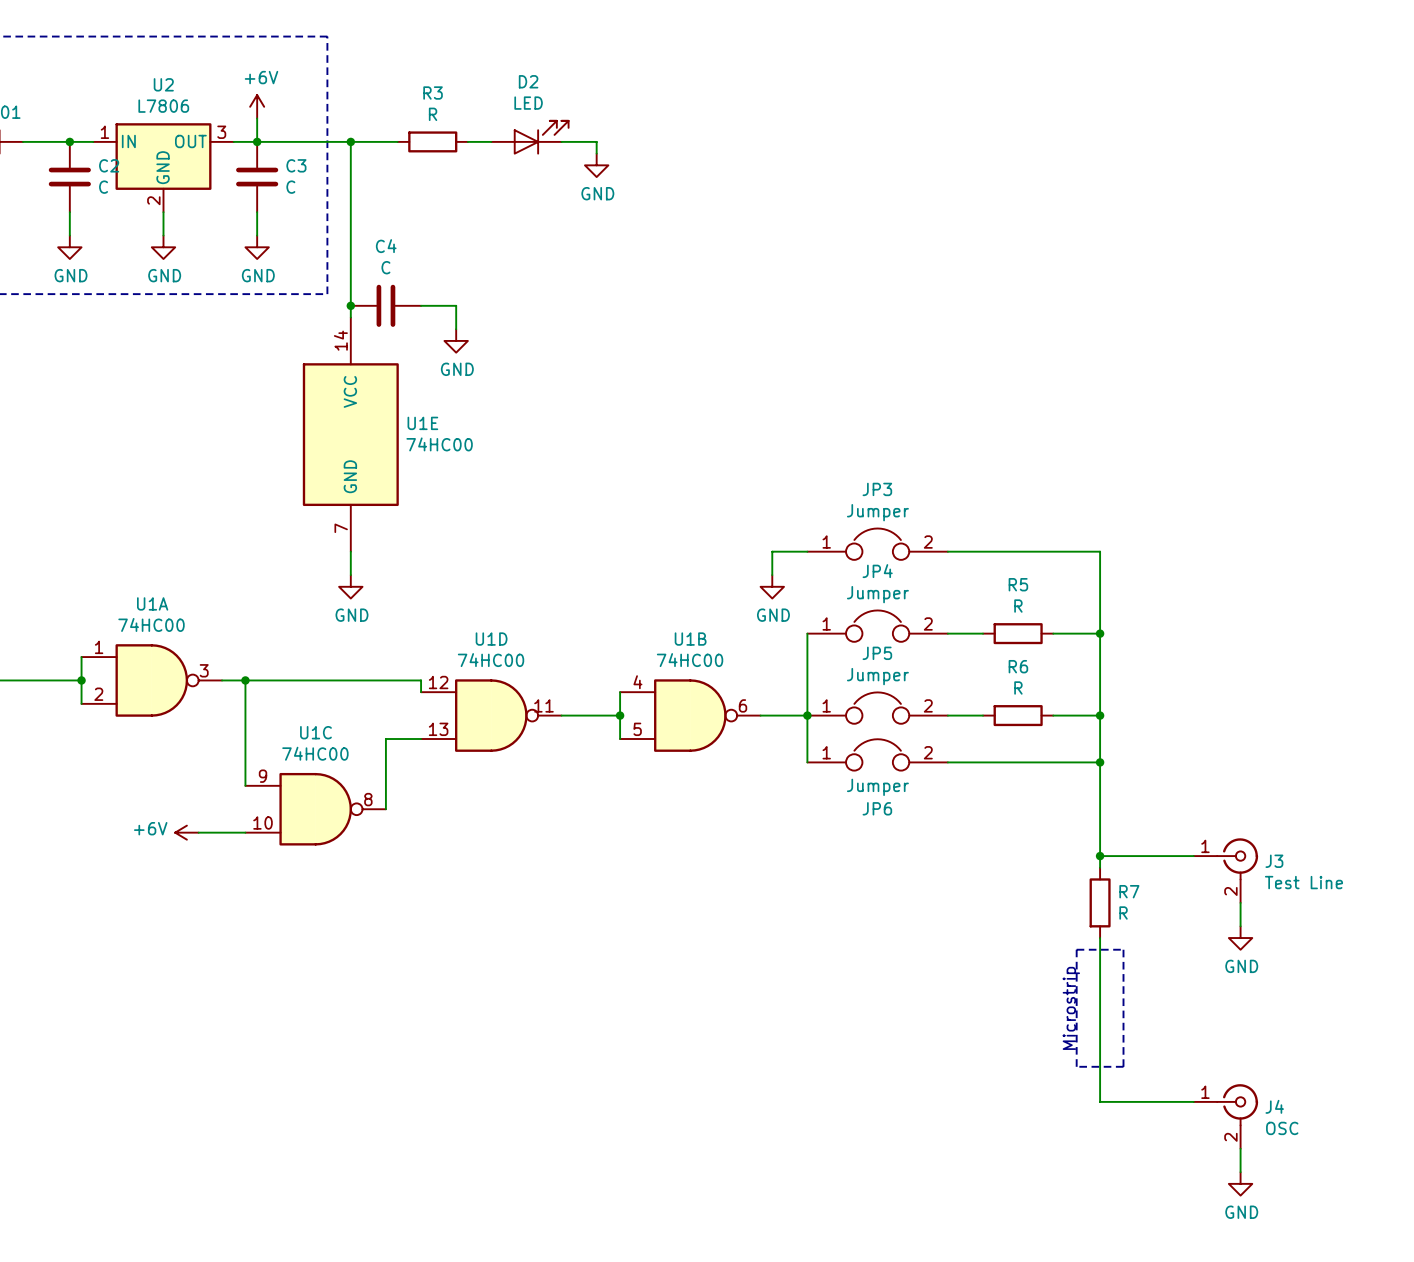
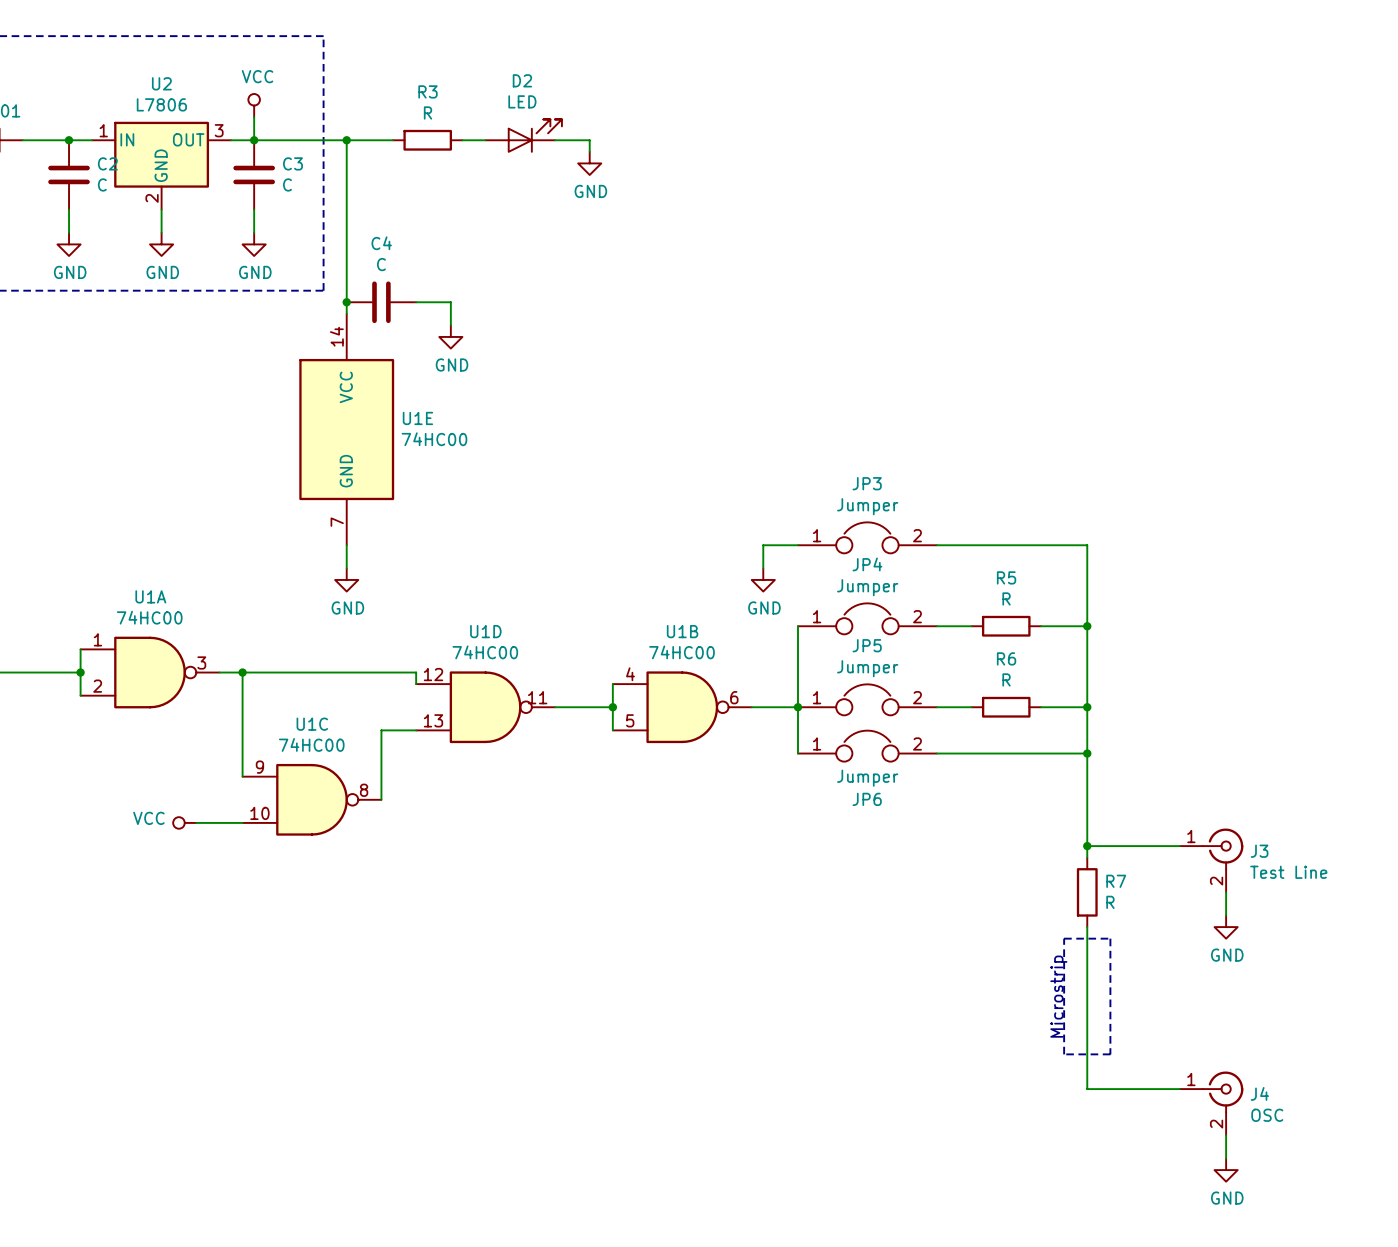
power symbol: +6V (257, 106) -> VCC (254, 105)
power symbol: +6V (186, 832) -> VCC (184, 822)

